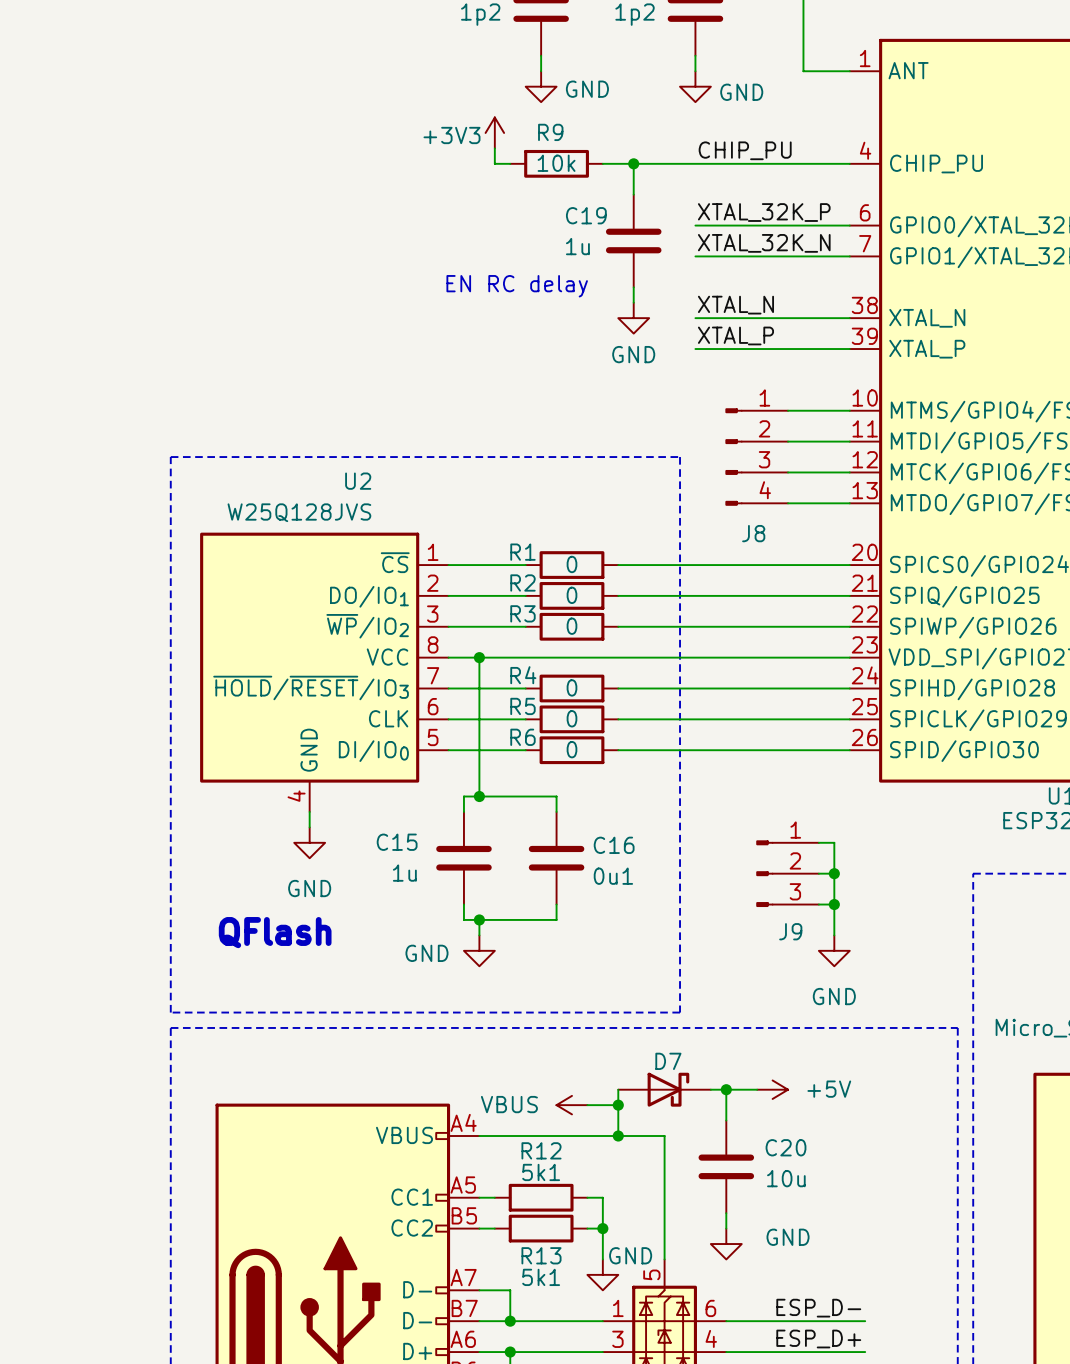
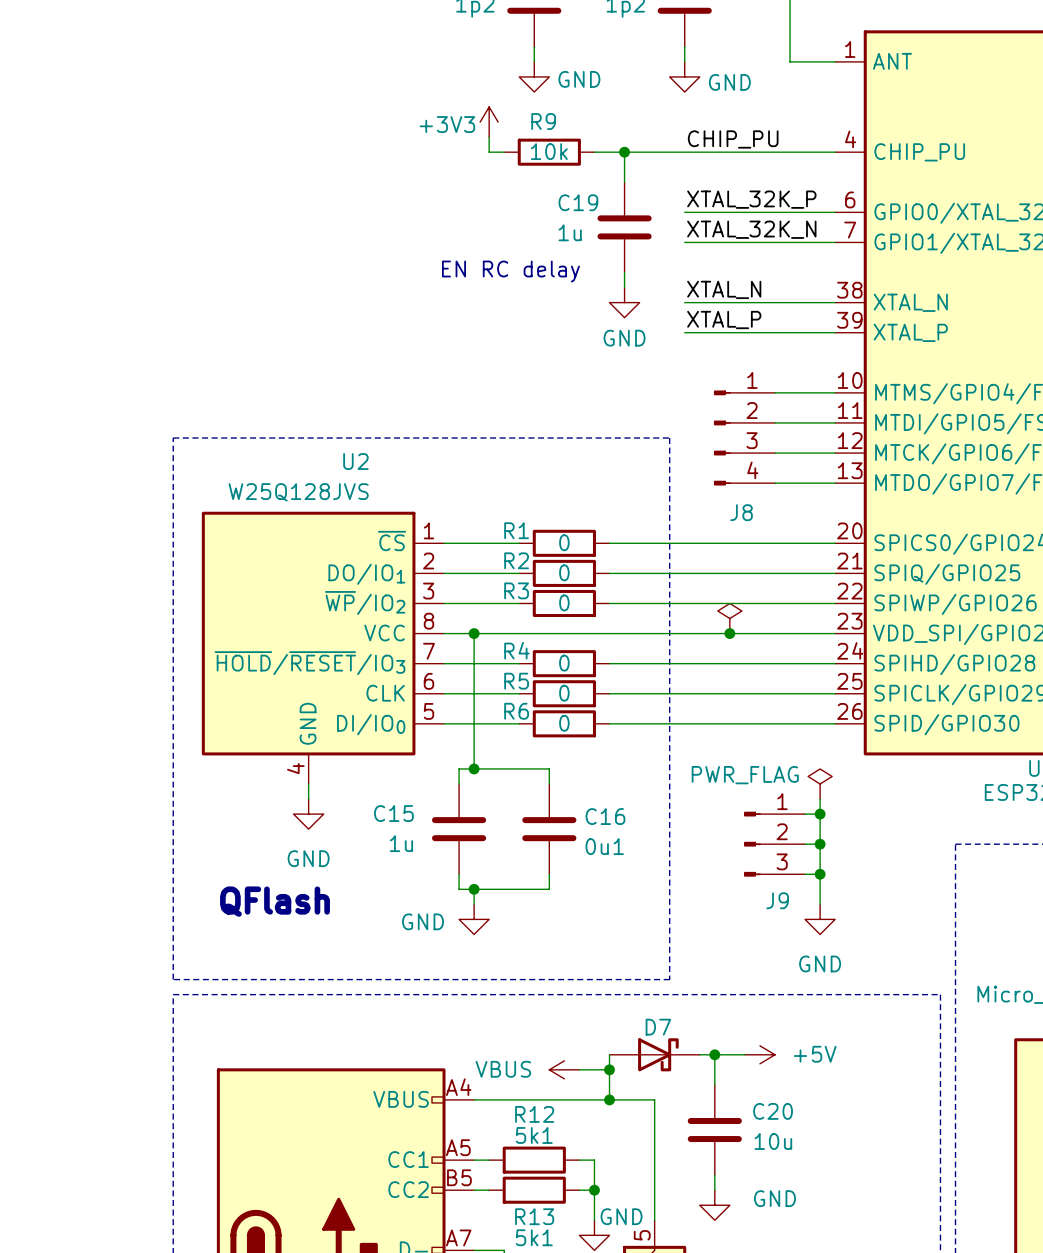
power symbol: none -> (729, 618)
junction: none -> (729, 633)
power symbol: none -> PWR_FLAG (820, 784)
wire: none -> (820, 799) (820, 814)
junction: none -> (820, 814)

